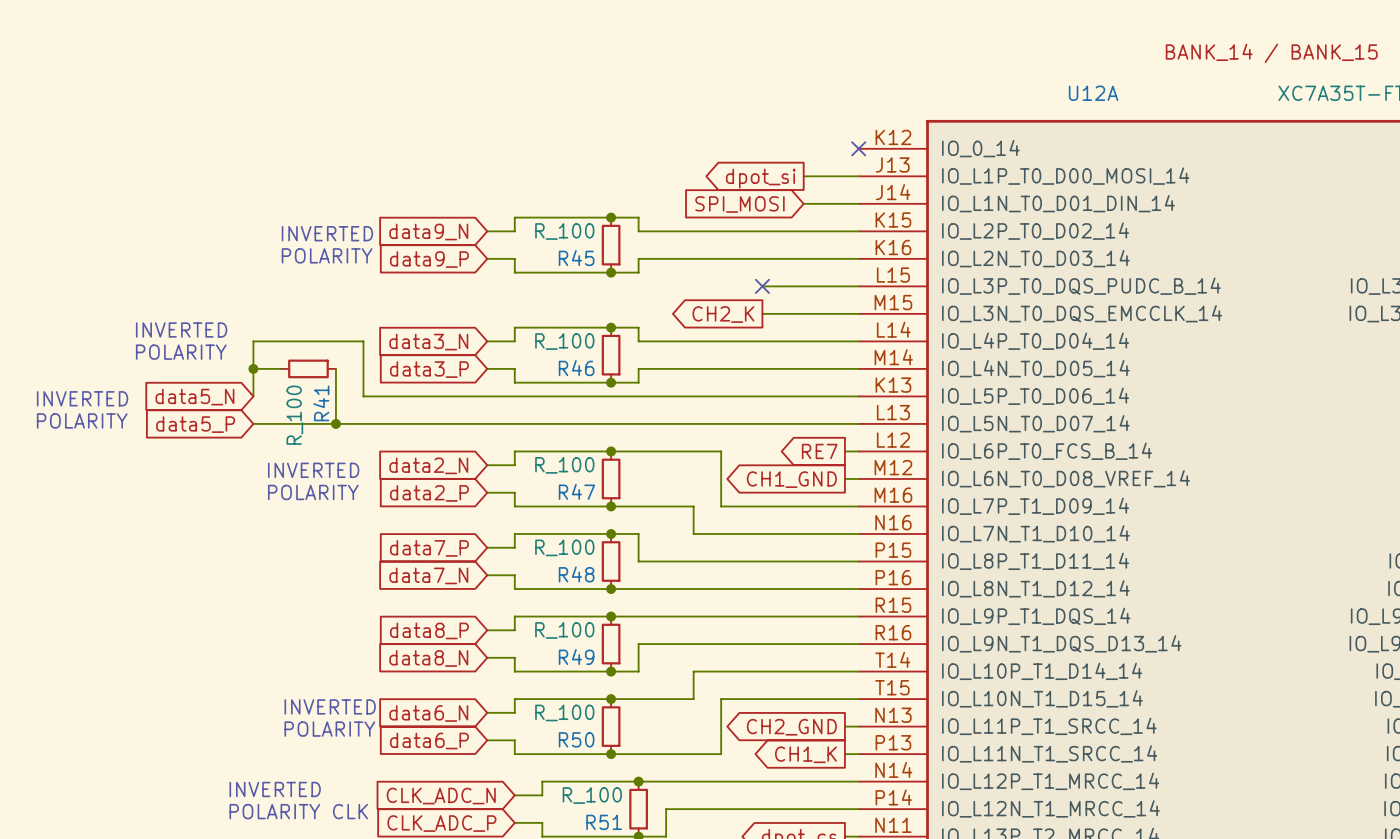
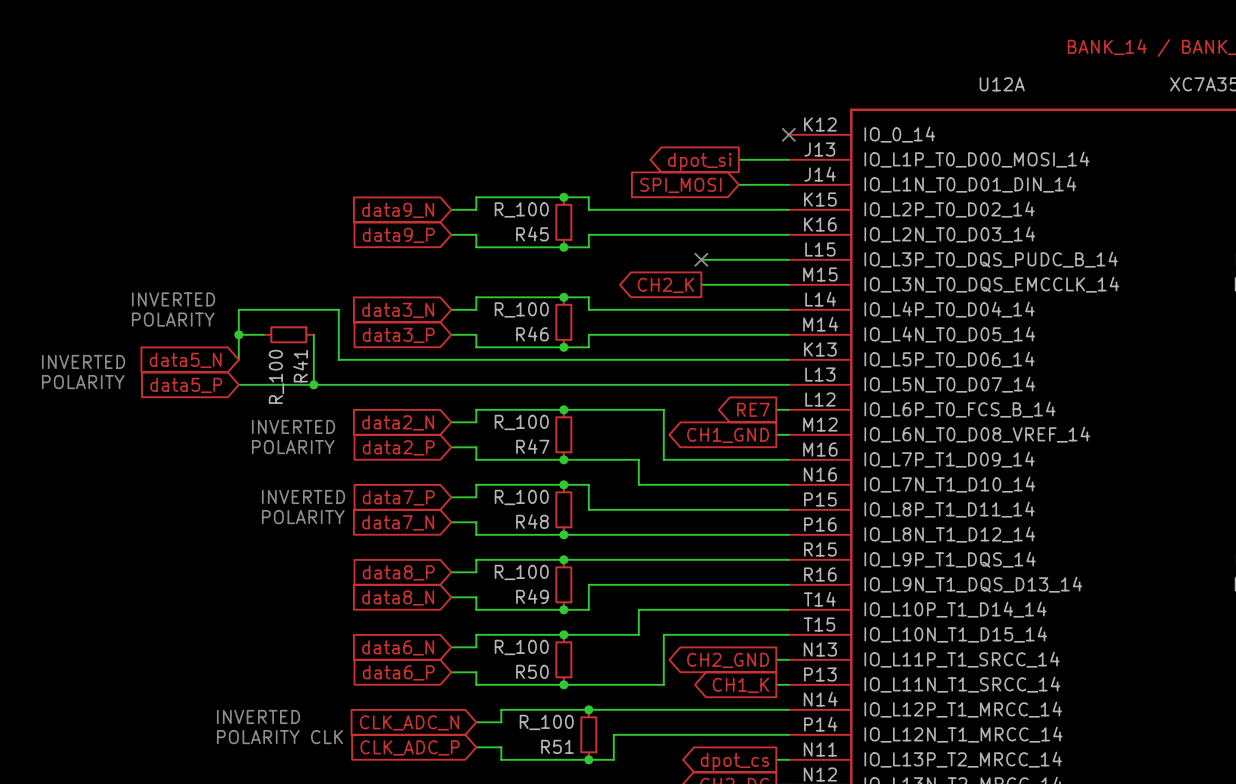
text: INVERTED (327, 233) -> none
text: POLARITY (327, 255) -> none
text: none -> INVERTED (303, 496)
text: none -> POLARITY (303, 517)
text: INVERTED (330, 706) -> none
text: POLARITY (329, 729) -> none

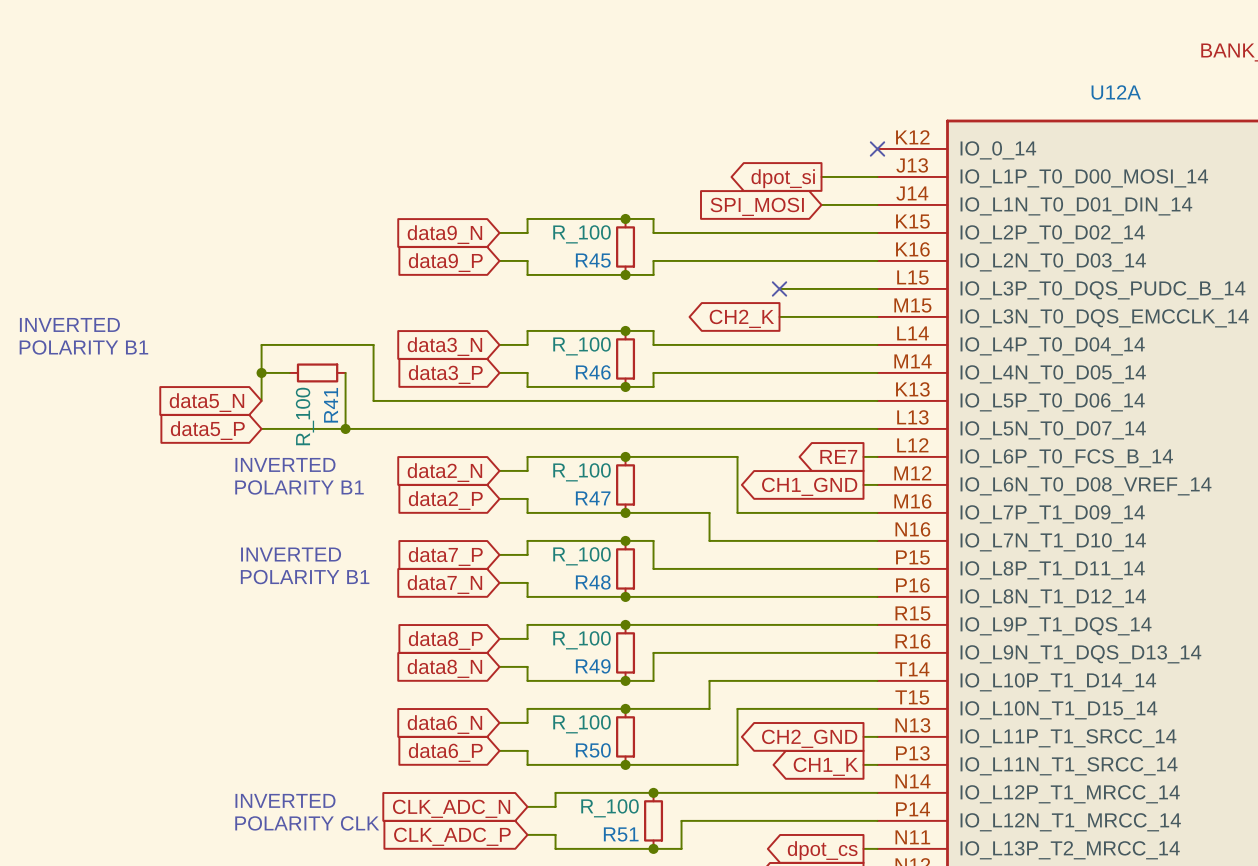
text: none -> INVERTED (69, 324)
text: INVERTED (173, 299) -> none
text: POLARITY (173, 319) -> POLARITY B1 (83, 347)
text: INVERTED (83, 361) -> none
text: POLARITY (83, 382) -> none
text position: INVERTED (293, 426) -> INVERTED (285, 464)
text: POLARITY (293, 447) -> POLARITY B1 (299, 487)
text position: INVERTED (303, 496) -> INVERTED (291, 554)
text: POLARITY (303, 517) -> POLARITY B1 (305, 577)

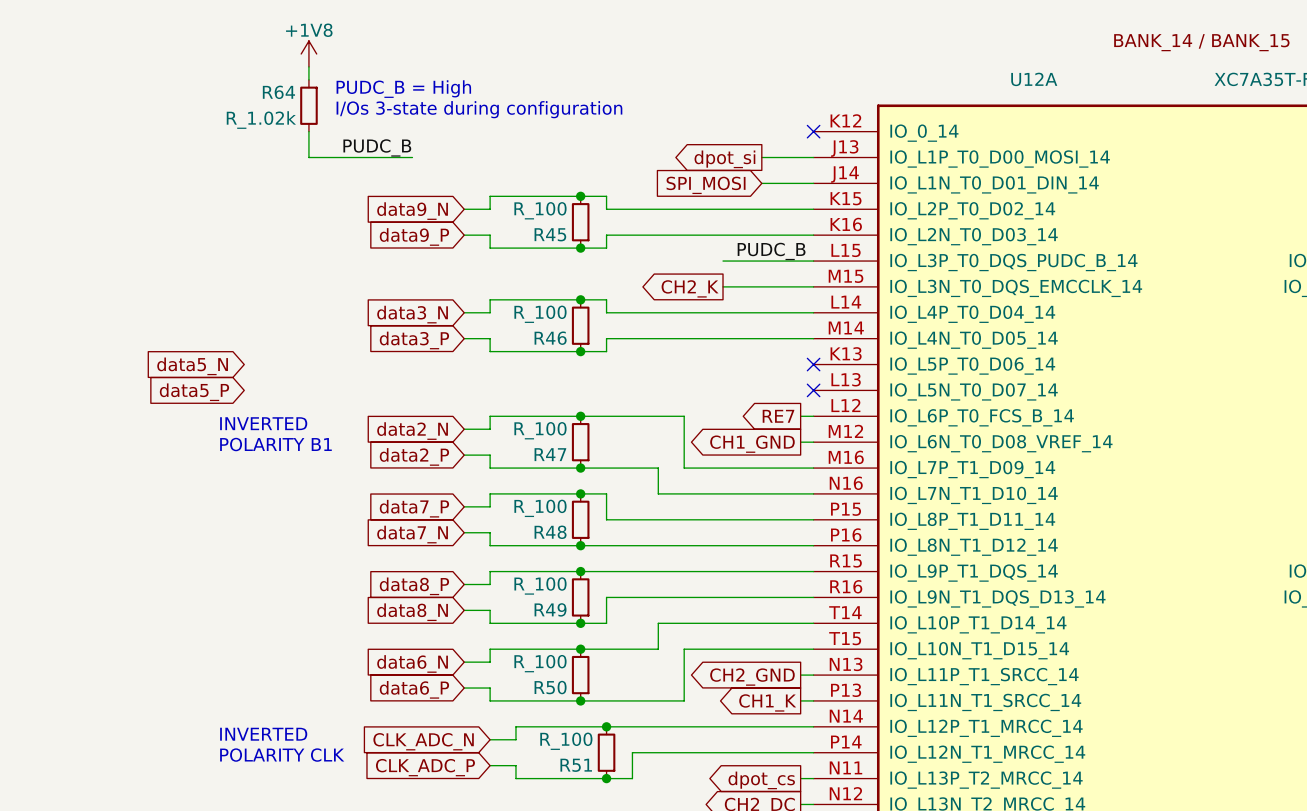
power symbol: none -> +1V8 (308, 54)
wire: none -> (308, 66) (308, 79)
text: none -> PUDC_B = High (403, 89)
R64: none -> R_1.02k (308, 105)
text: none -> I/Os 3-state during configuration (479, 109)
wire: none -> (308, 131) (308, 157) (412, 157)
label: none -> PUDC_B (377, 147)
label: none -> PUDC_B (771, 251)
no-connect mark: (779, 288) -> none
text: INVERTED (69, 324) -> none
text: POLARITY B1 (83, 347) -> none
wire: (261, 372) (289, 372) -> none
junction: (261, 372) -> none
R41: R_100 (317, 372) -> none
wire: (345, 372) (345, 428) -> none
wire: (261, 400) (261, 344) (373, 344) (373, 400) (877, 400) -> none
no-connect mark: none -> (813, 364)
wire: (261, 428) (877, 428) -> none
junction: (345, 428) -> none
no-connect mark: none -> (813, 390)
text: INVERTED (291, 554) -> none
text: POLARITY B1 (305, 577) -> none

